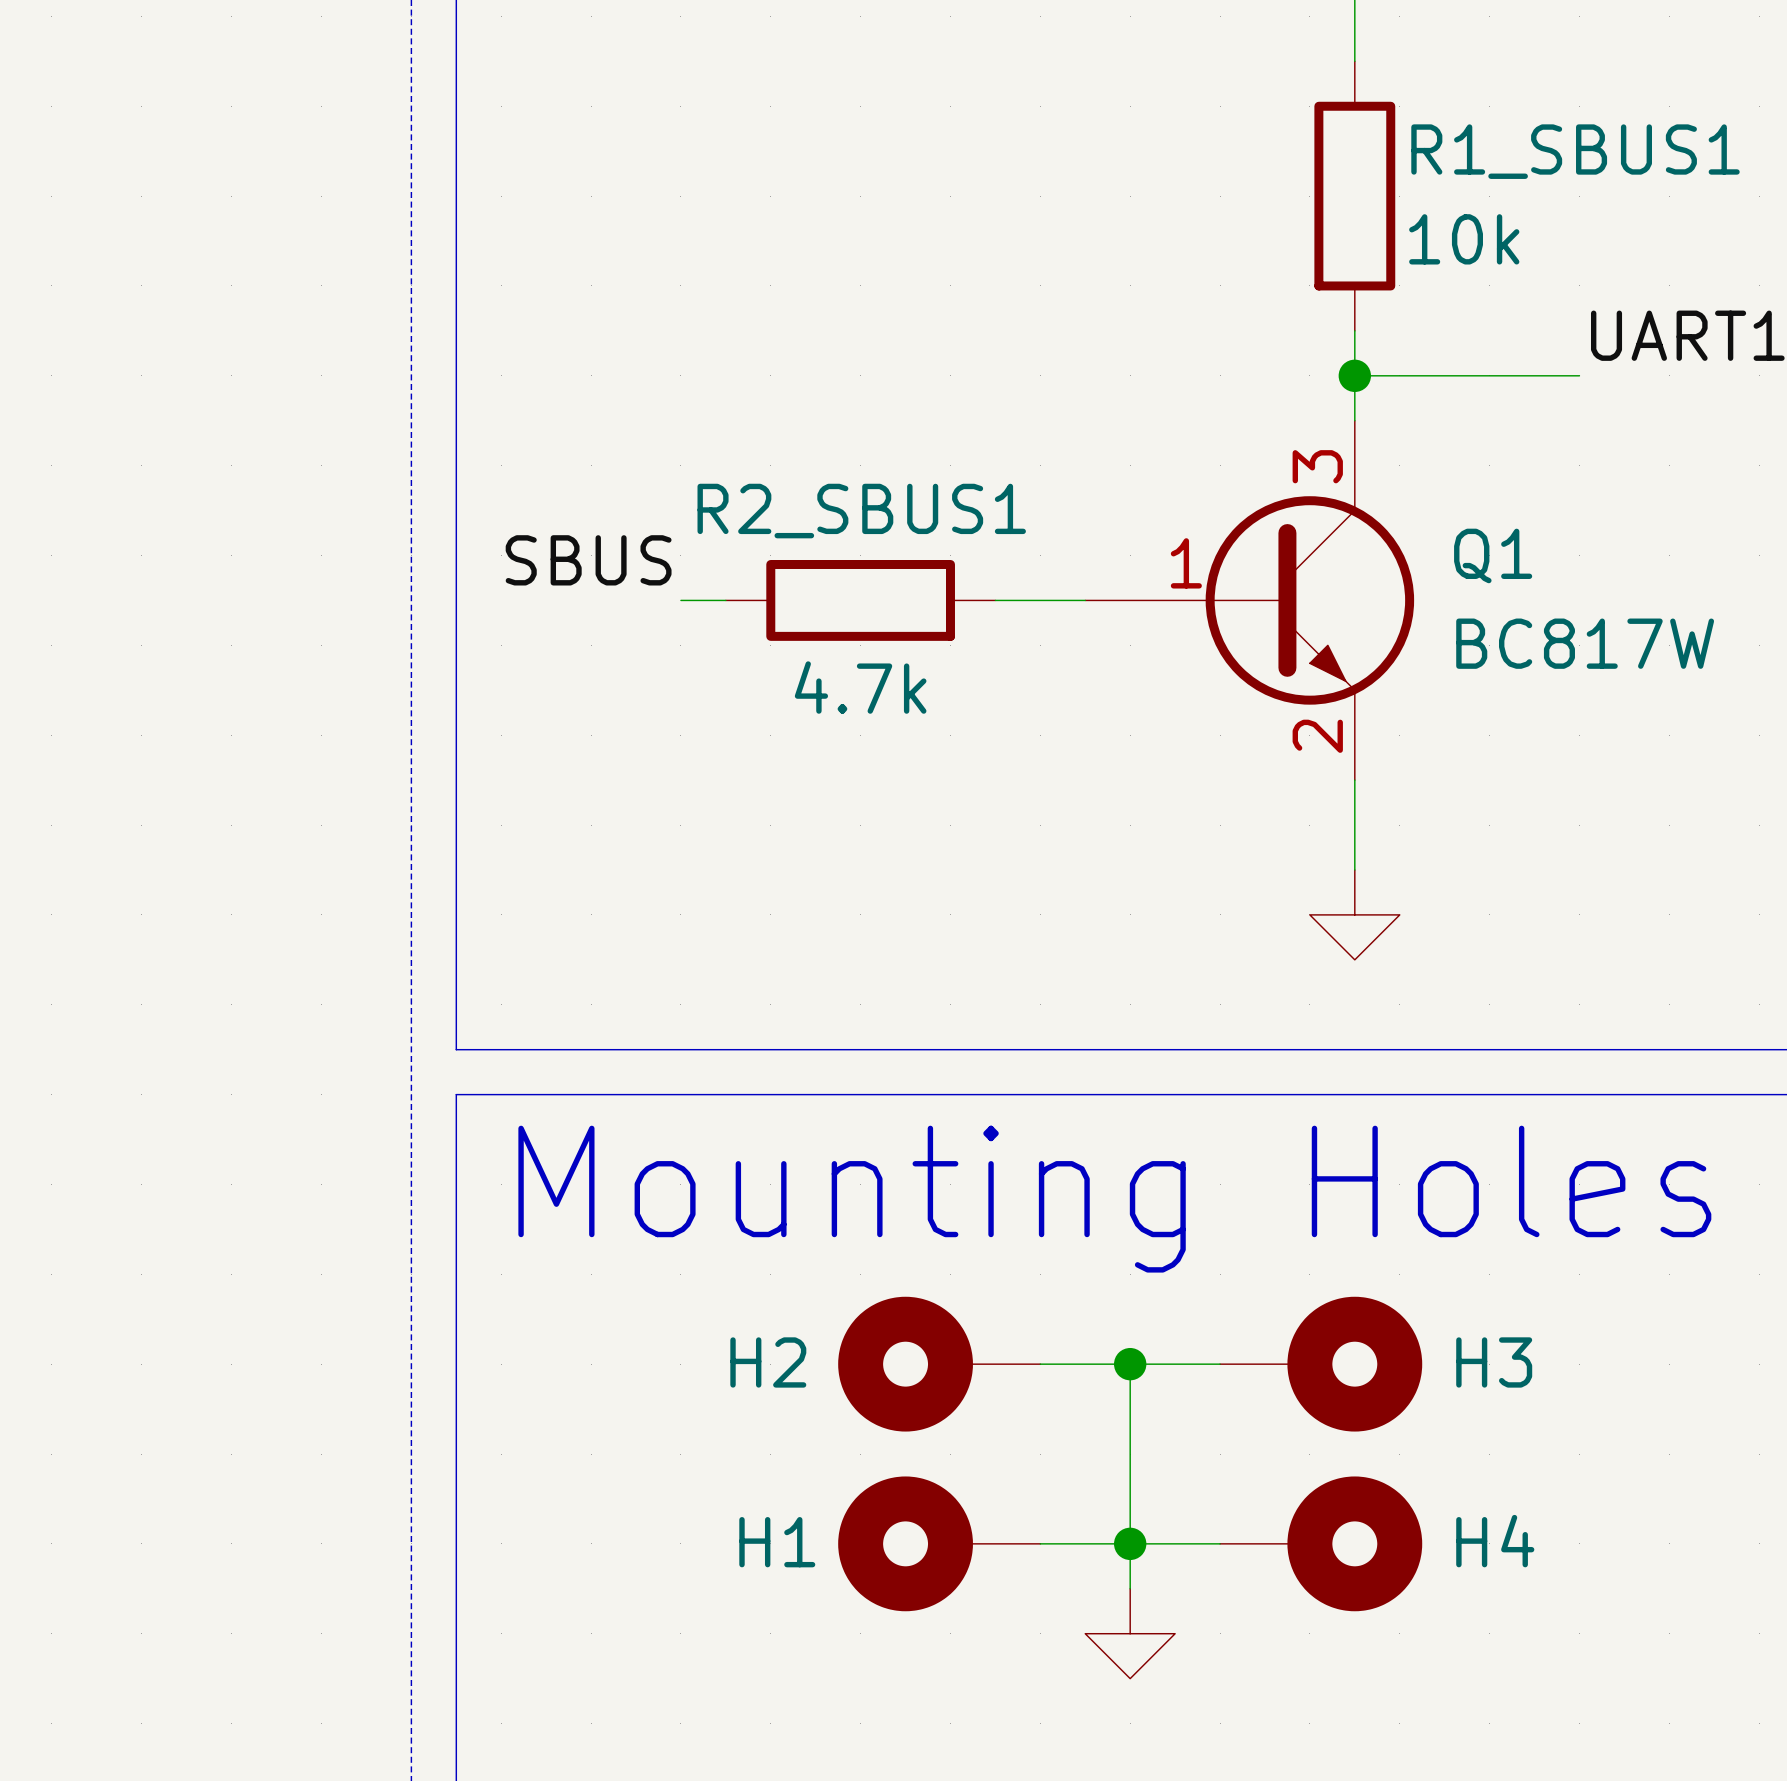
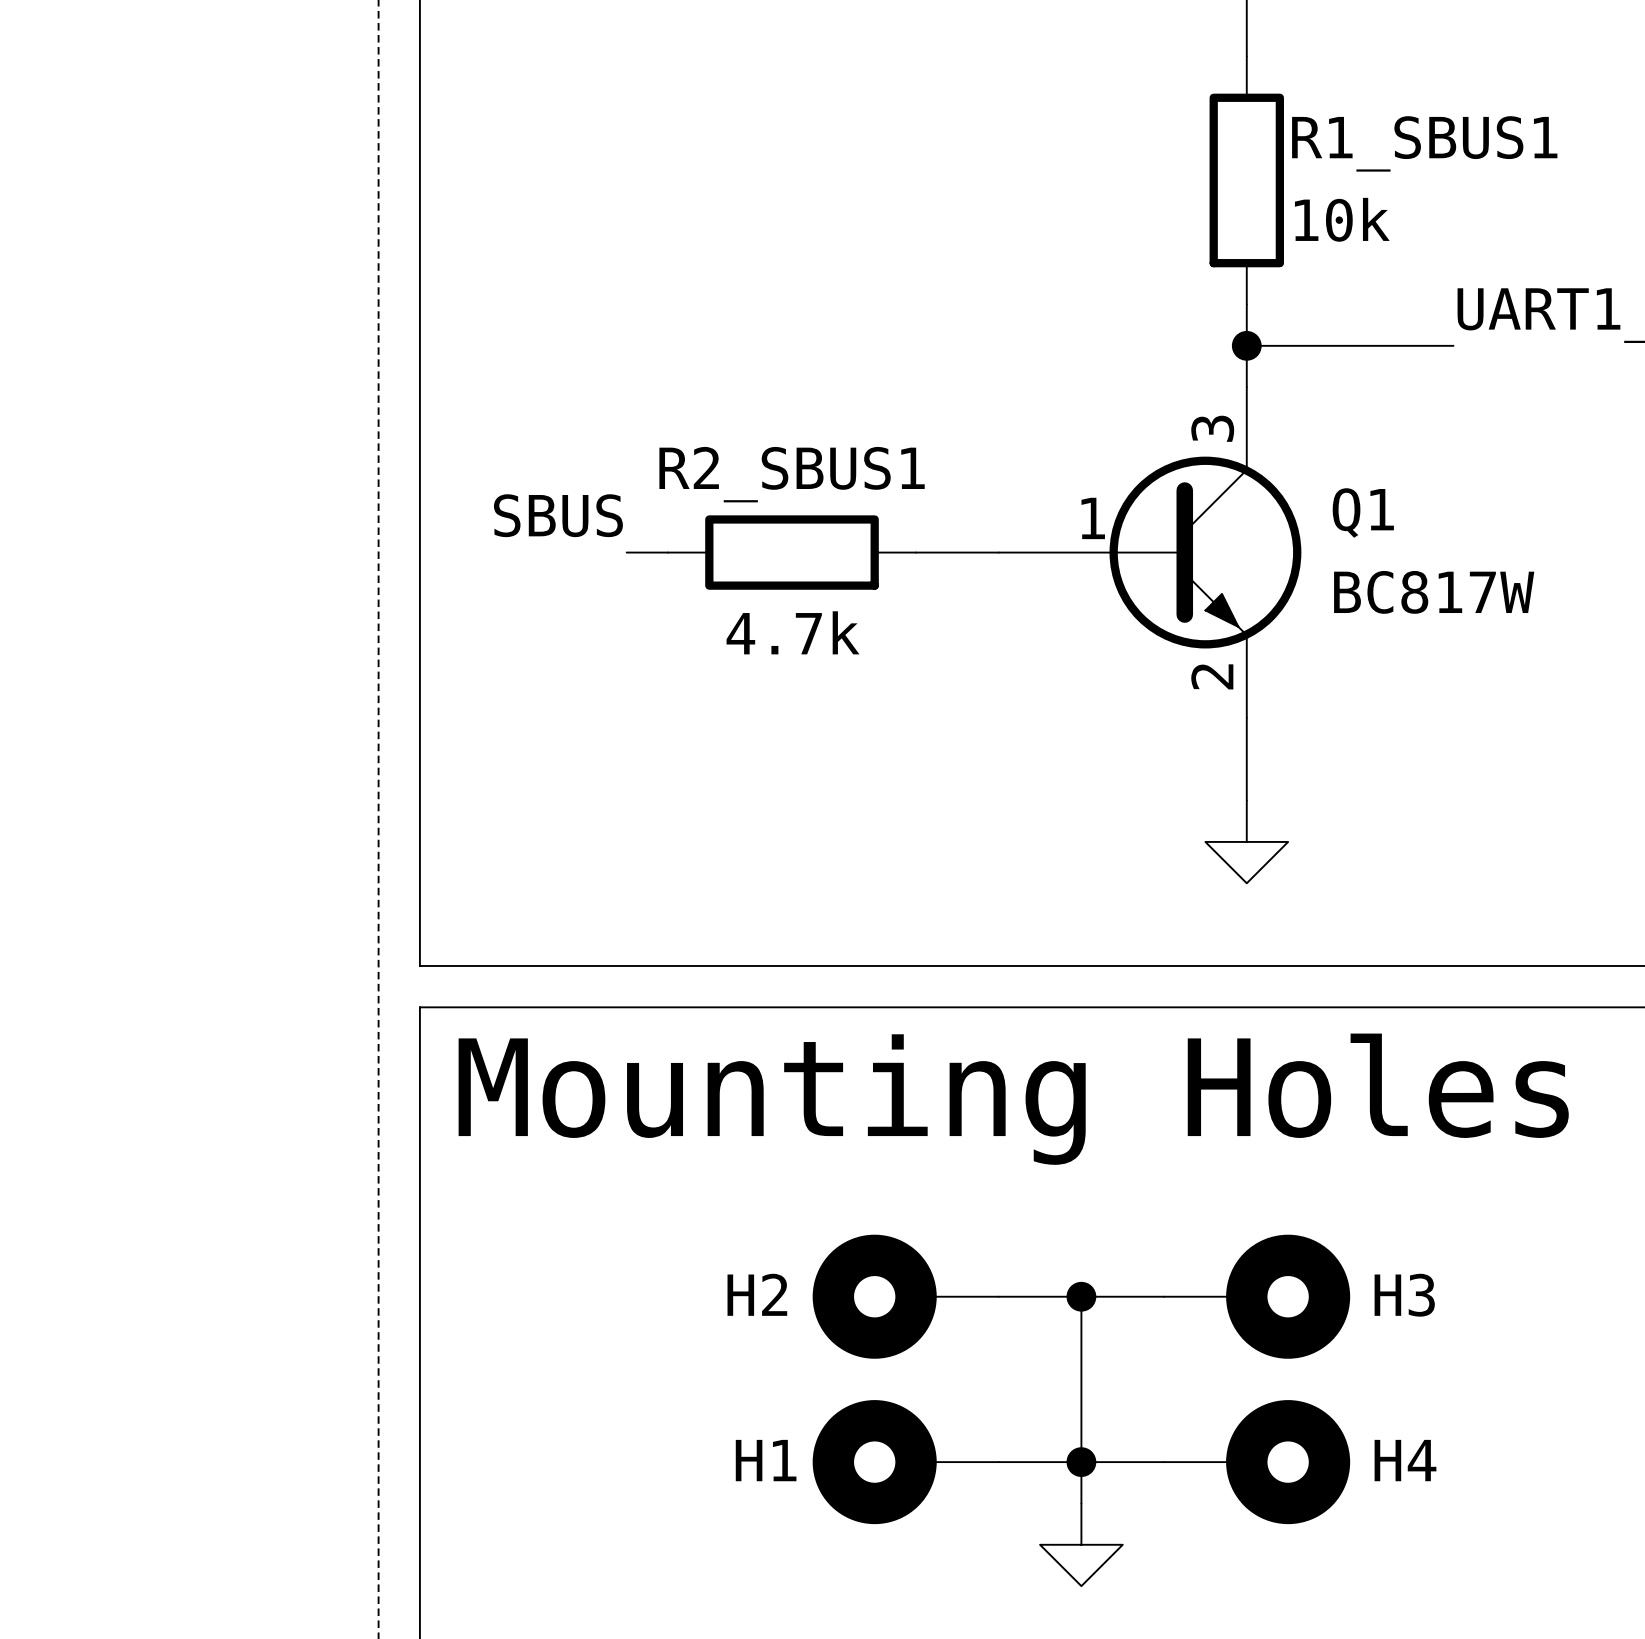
H2 position: (939, 1364) -> (905, 1296)
wire: (1040, 1364) (1220, 1364) -> (998, 1296) (1164, 1296)
wire: (1130, 1364) (1130, 1588) -> (1081, 1296) (1081, 1503)
junction position: (1130, 1364) -> (1081, 1296)
H3 position: (1321, 1364) -> (1257, 1296)
H1 position: (939, 1543) -> (905, 1462)
wire: (1040, 1543) (1220, 1543) -> (998, 1462) (1164, 1462)
junction position: (1130, 1543) -> (1081, 1462)
H4 position: (1321, 1543) -> (1257, 1462)
power symbol position: (1130, 1633) -> (1081, 1544)

